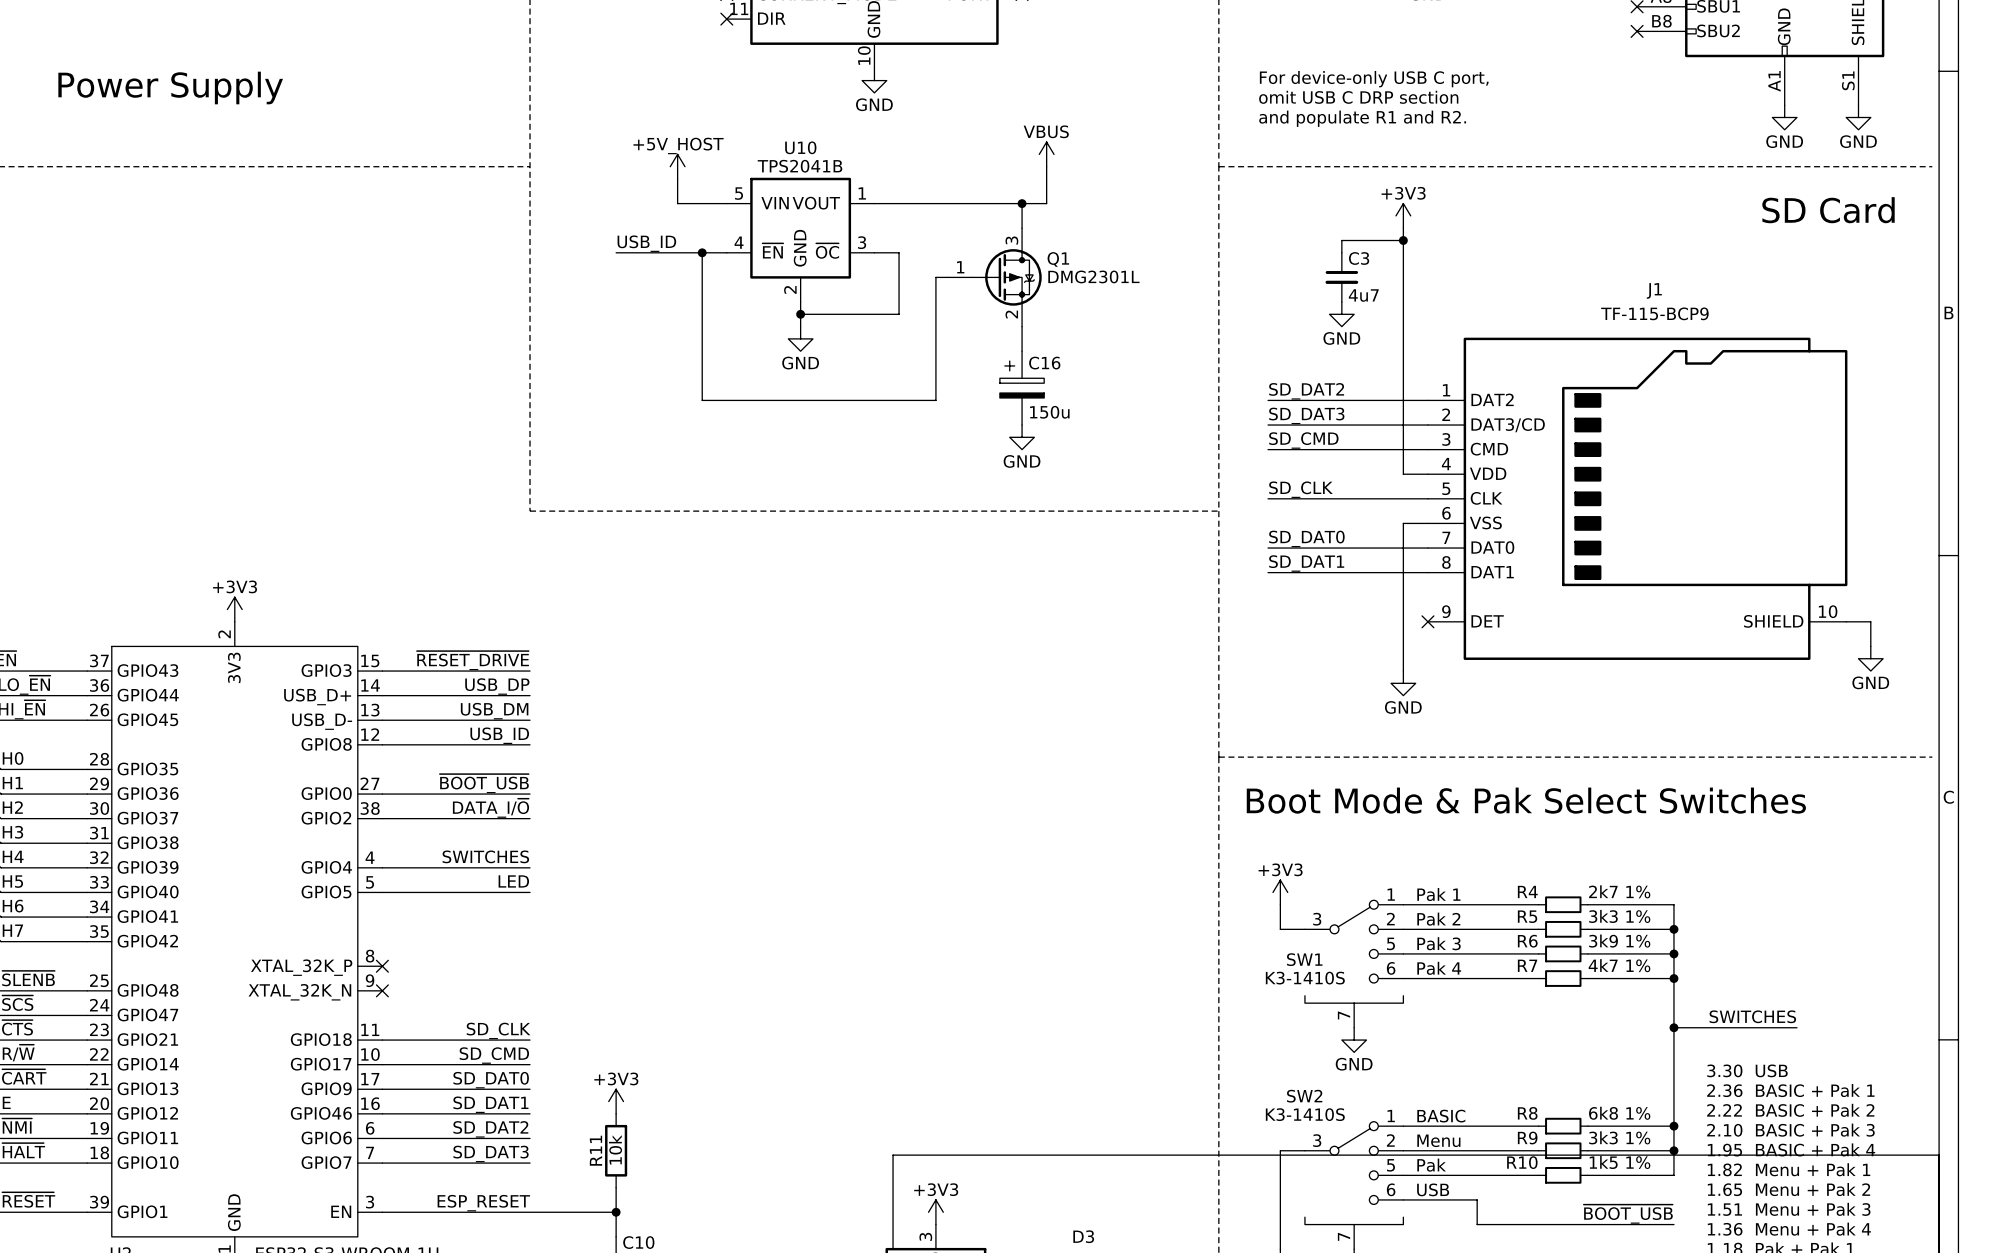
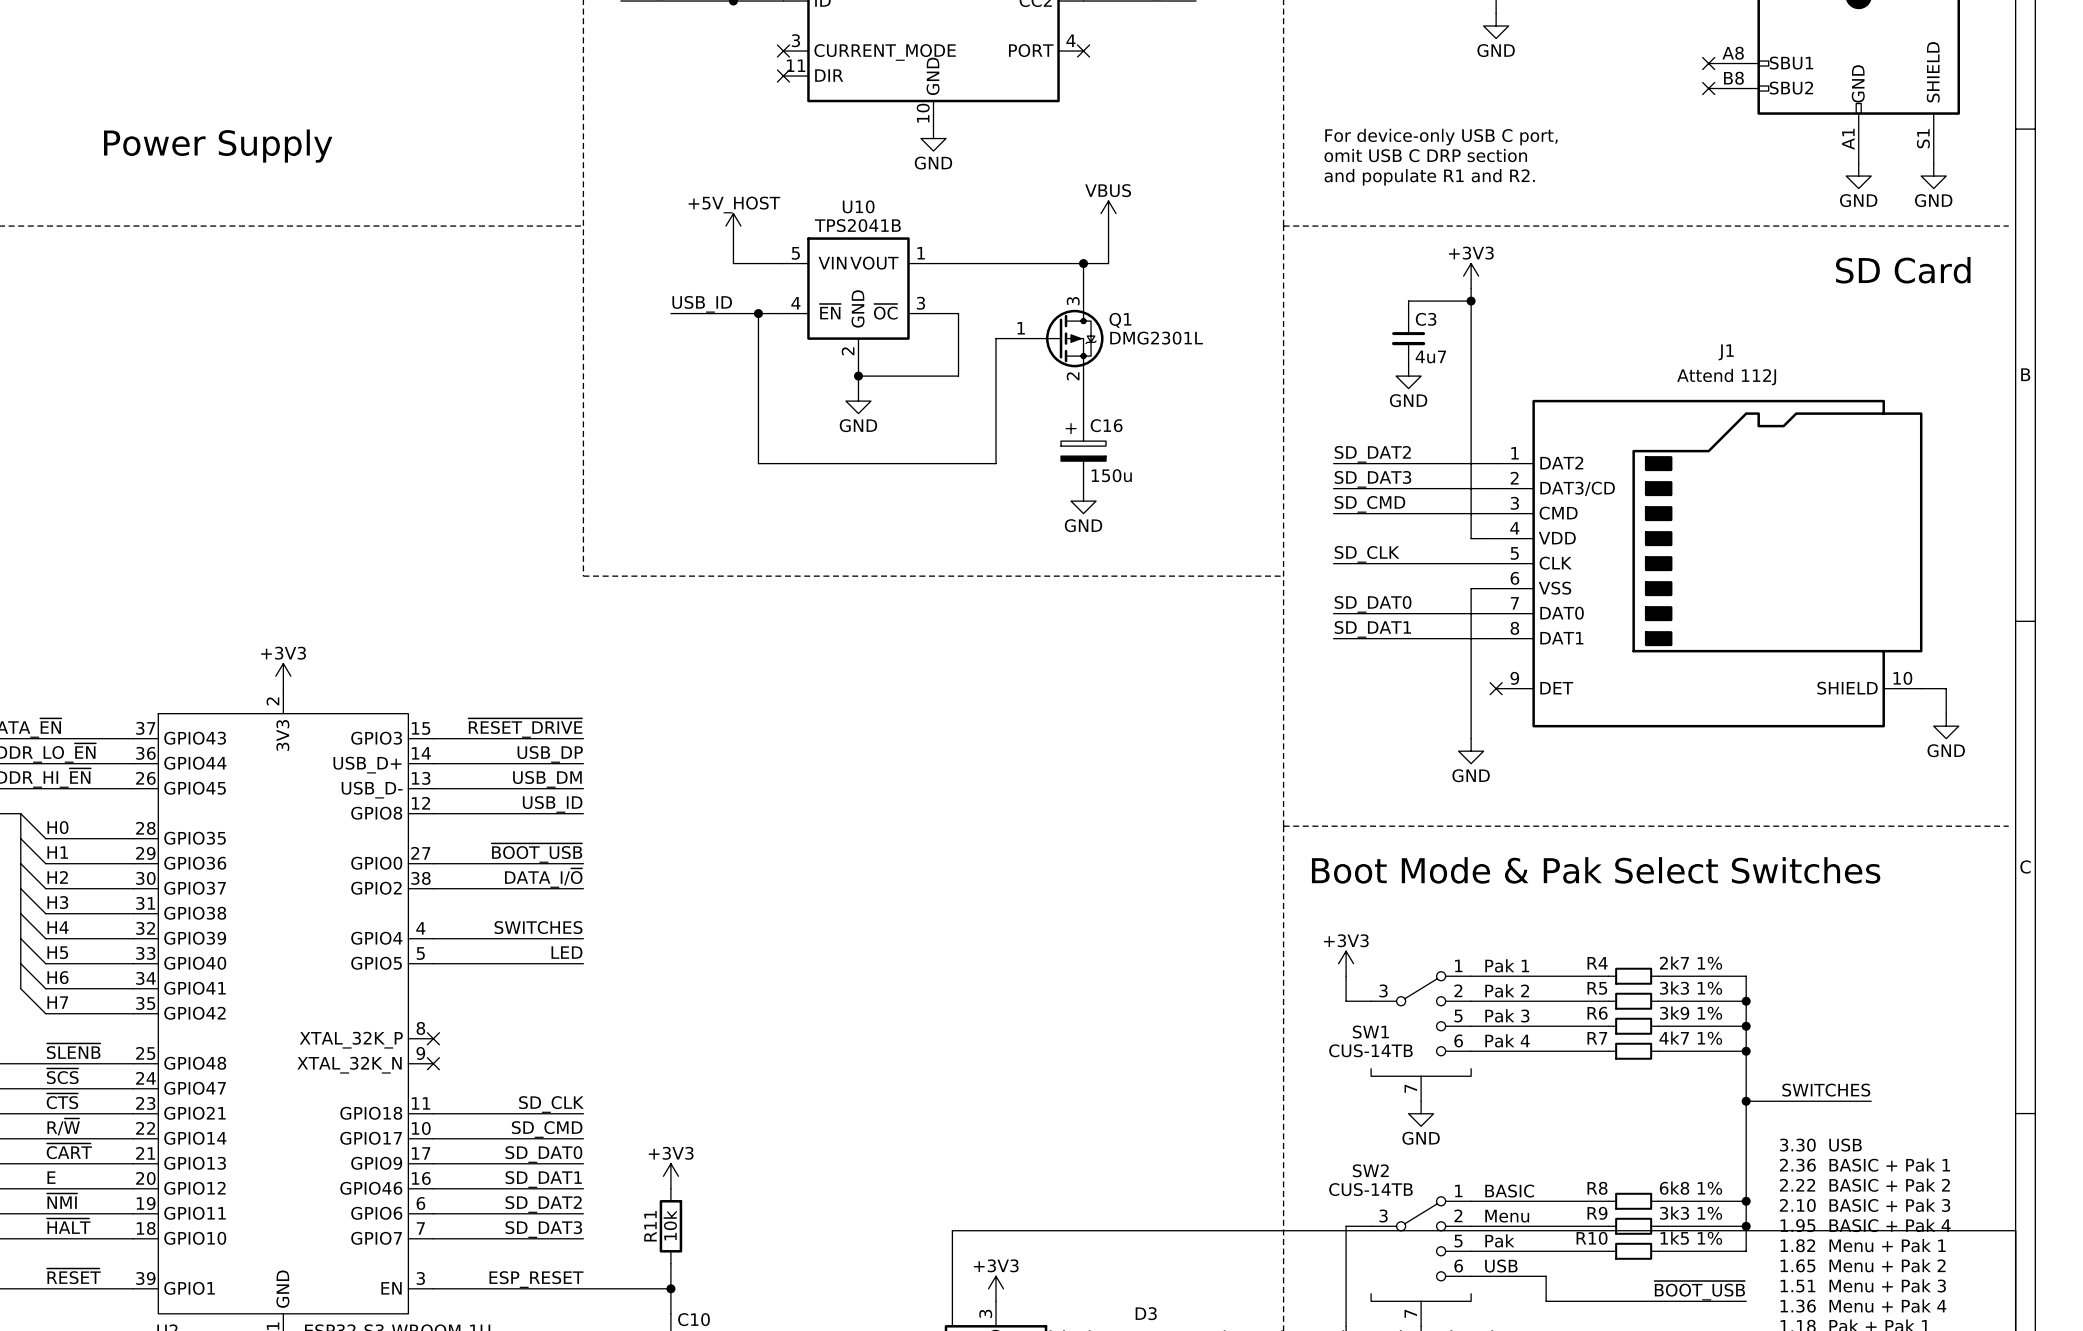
J1 value: TF-115-BCP9 (1654, 313) -> Attend 112J (1726, 377)
SW1 value: K3-1410S (1305, 978) -> CUS-14TB (1370, 1050)
SW2 value: K3-1410S (1305, 1114) -> CUS-14TB (1370, 1189)

